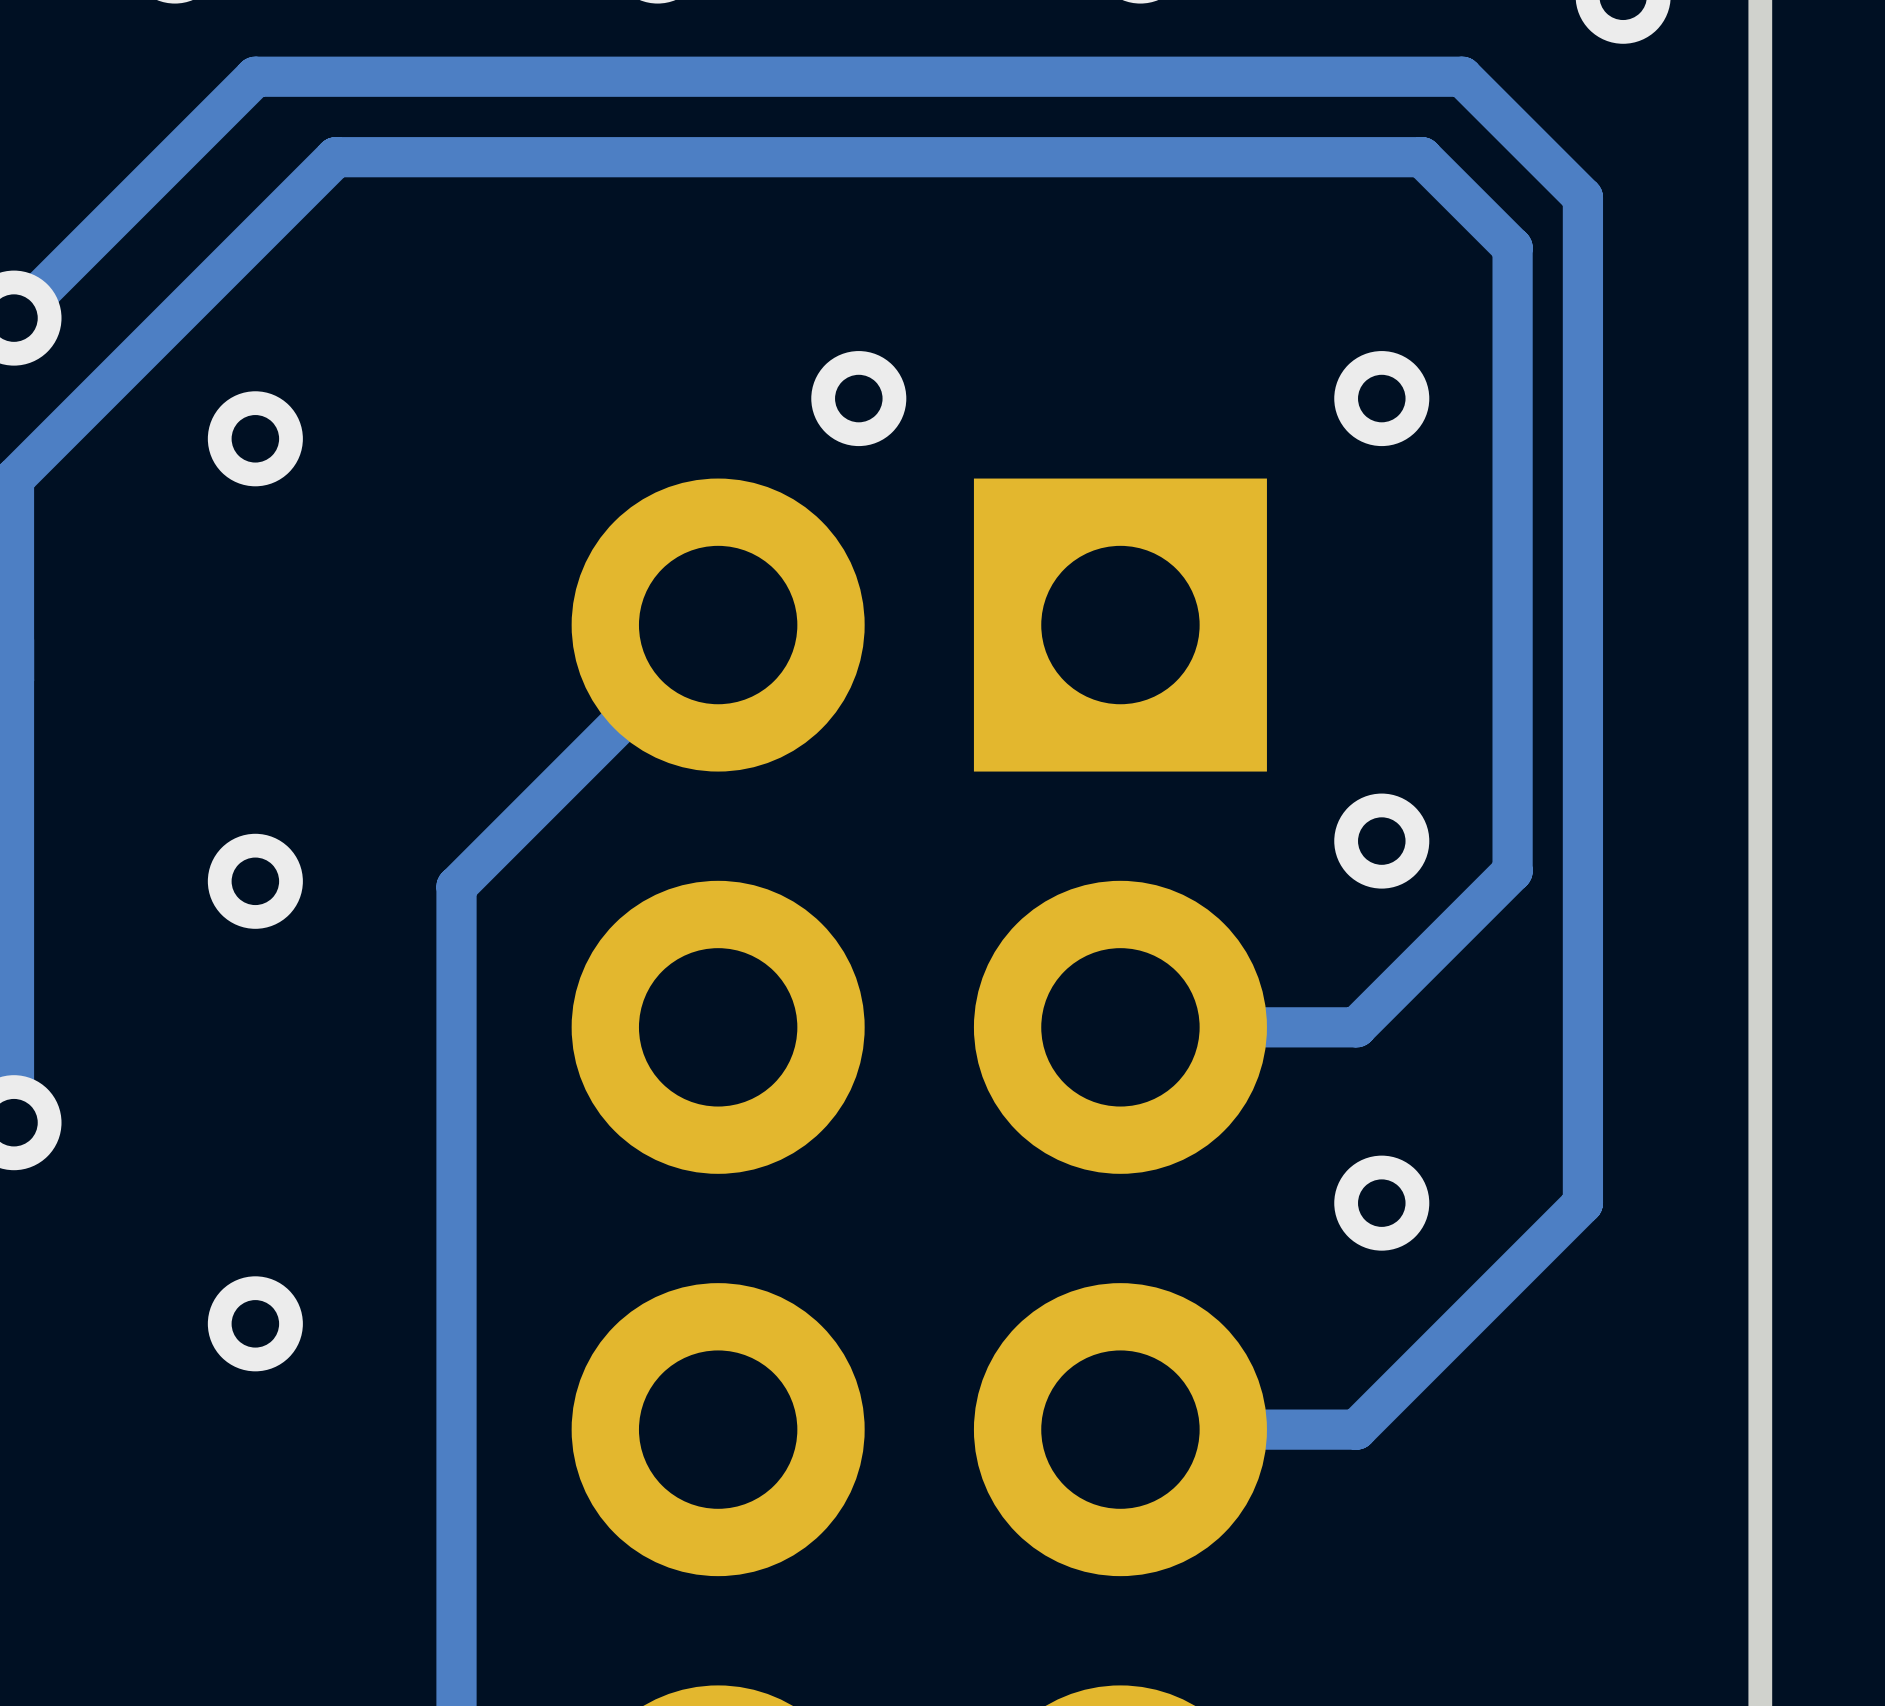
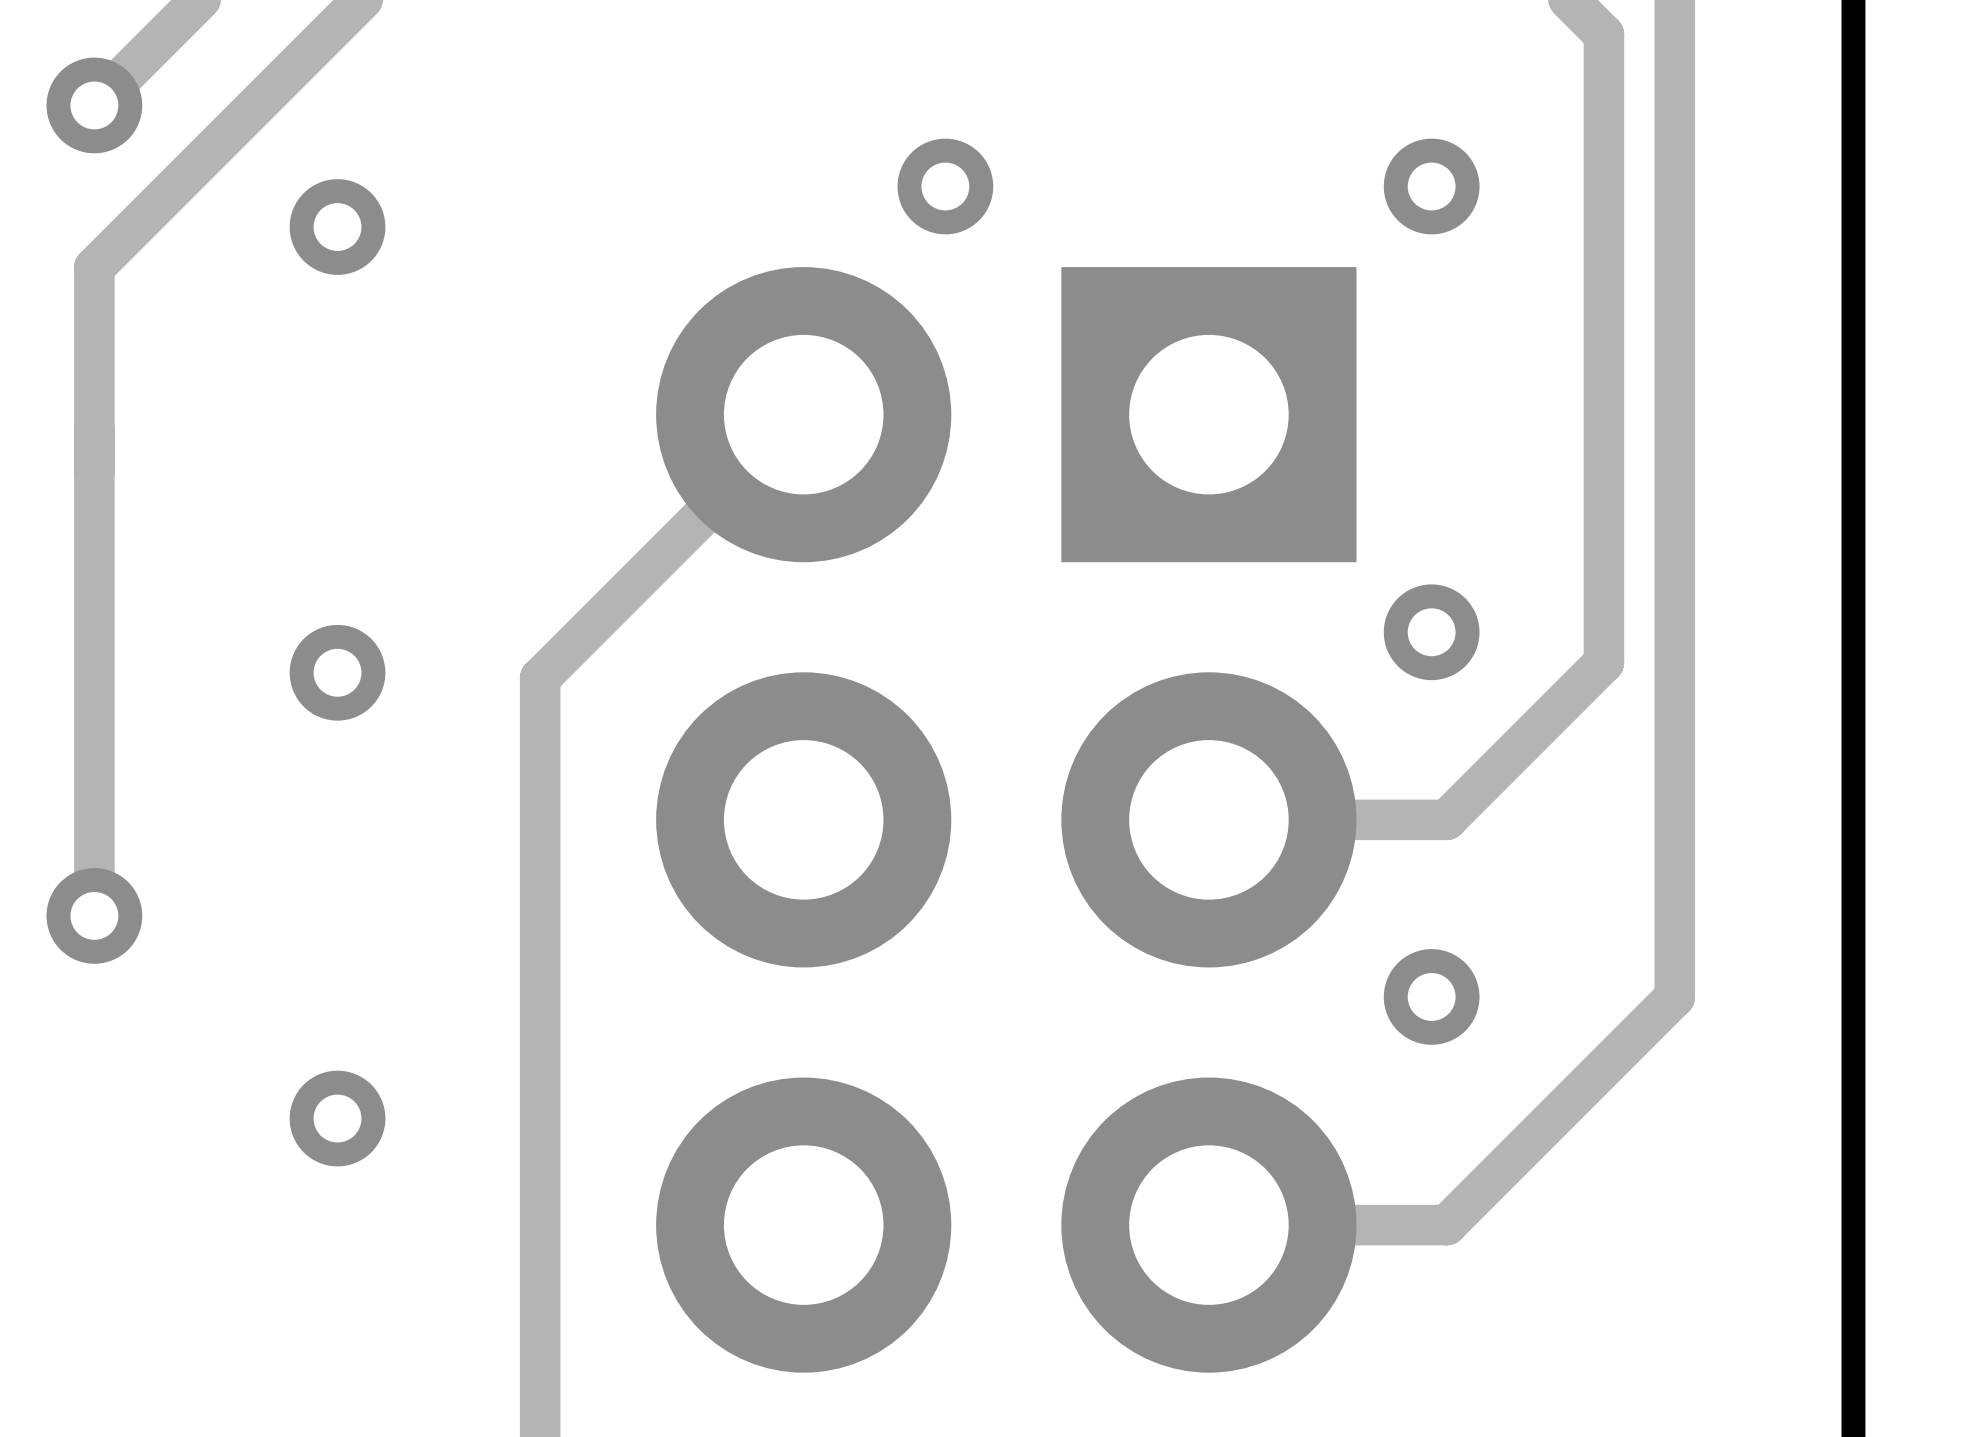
via position: (1381, 398) -> (1431, 186)
via position: (1381, 841) -> (1431, 632)
via position: (1381, 1203) -> (1431, 996)

